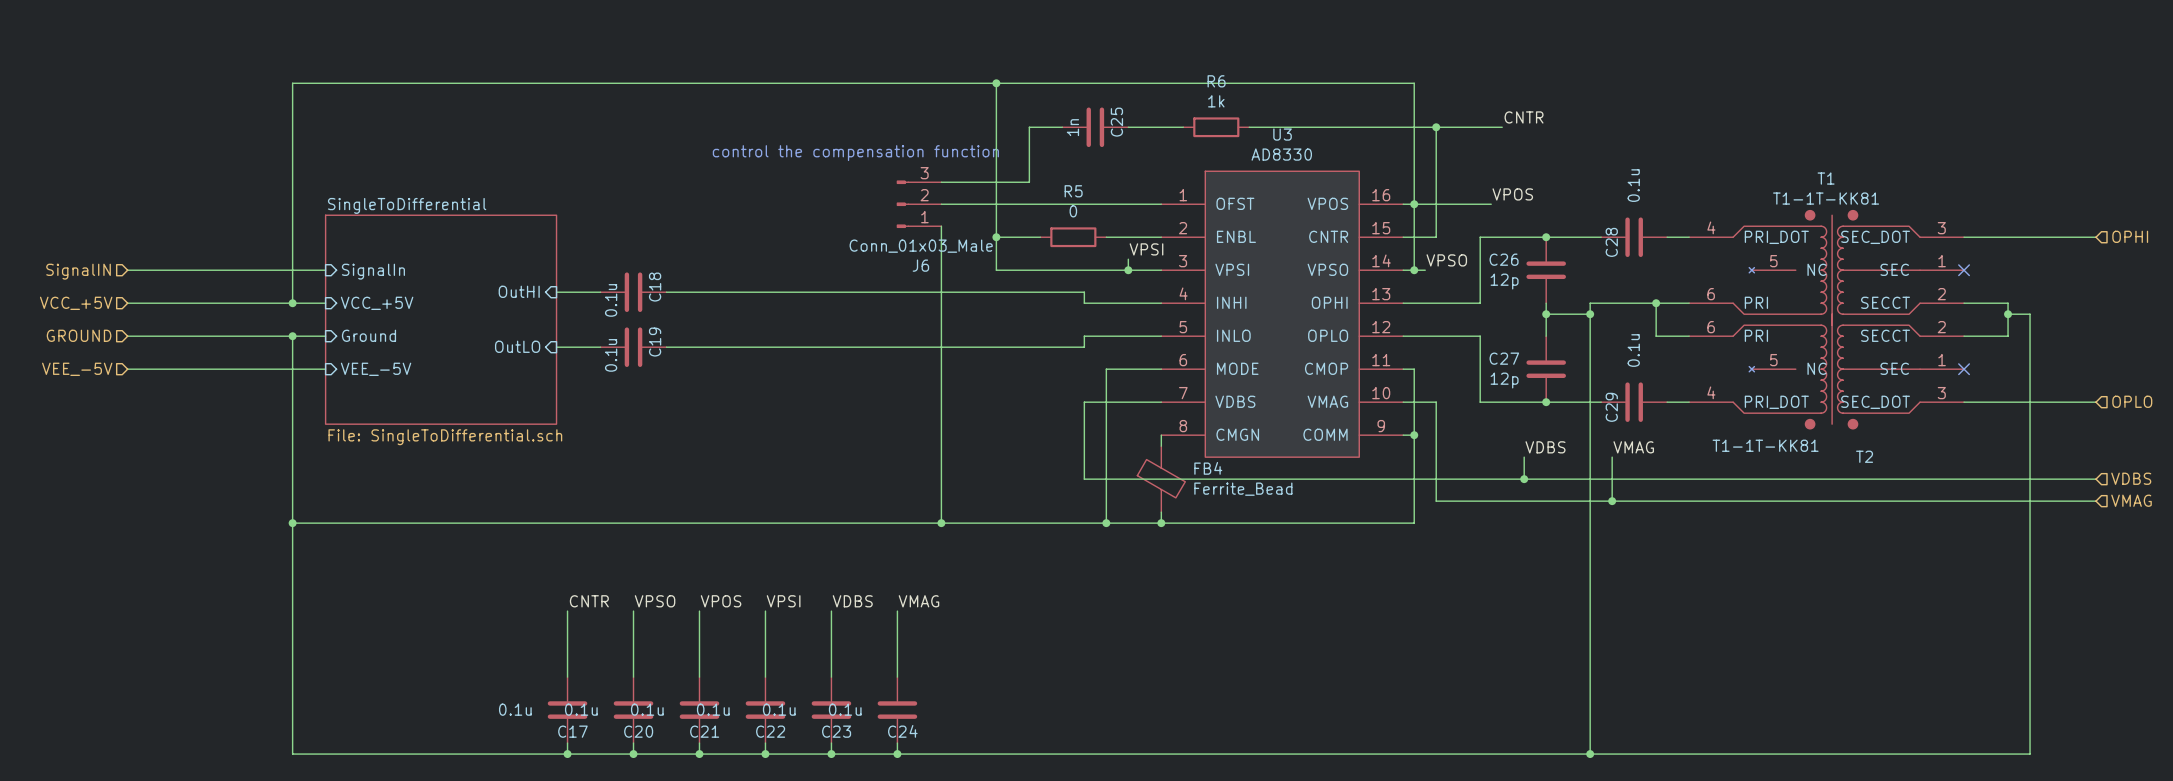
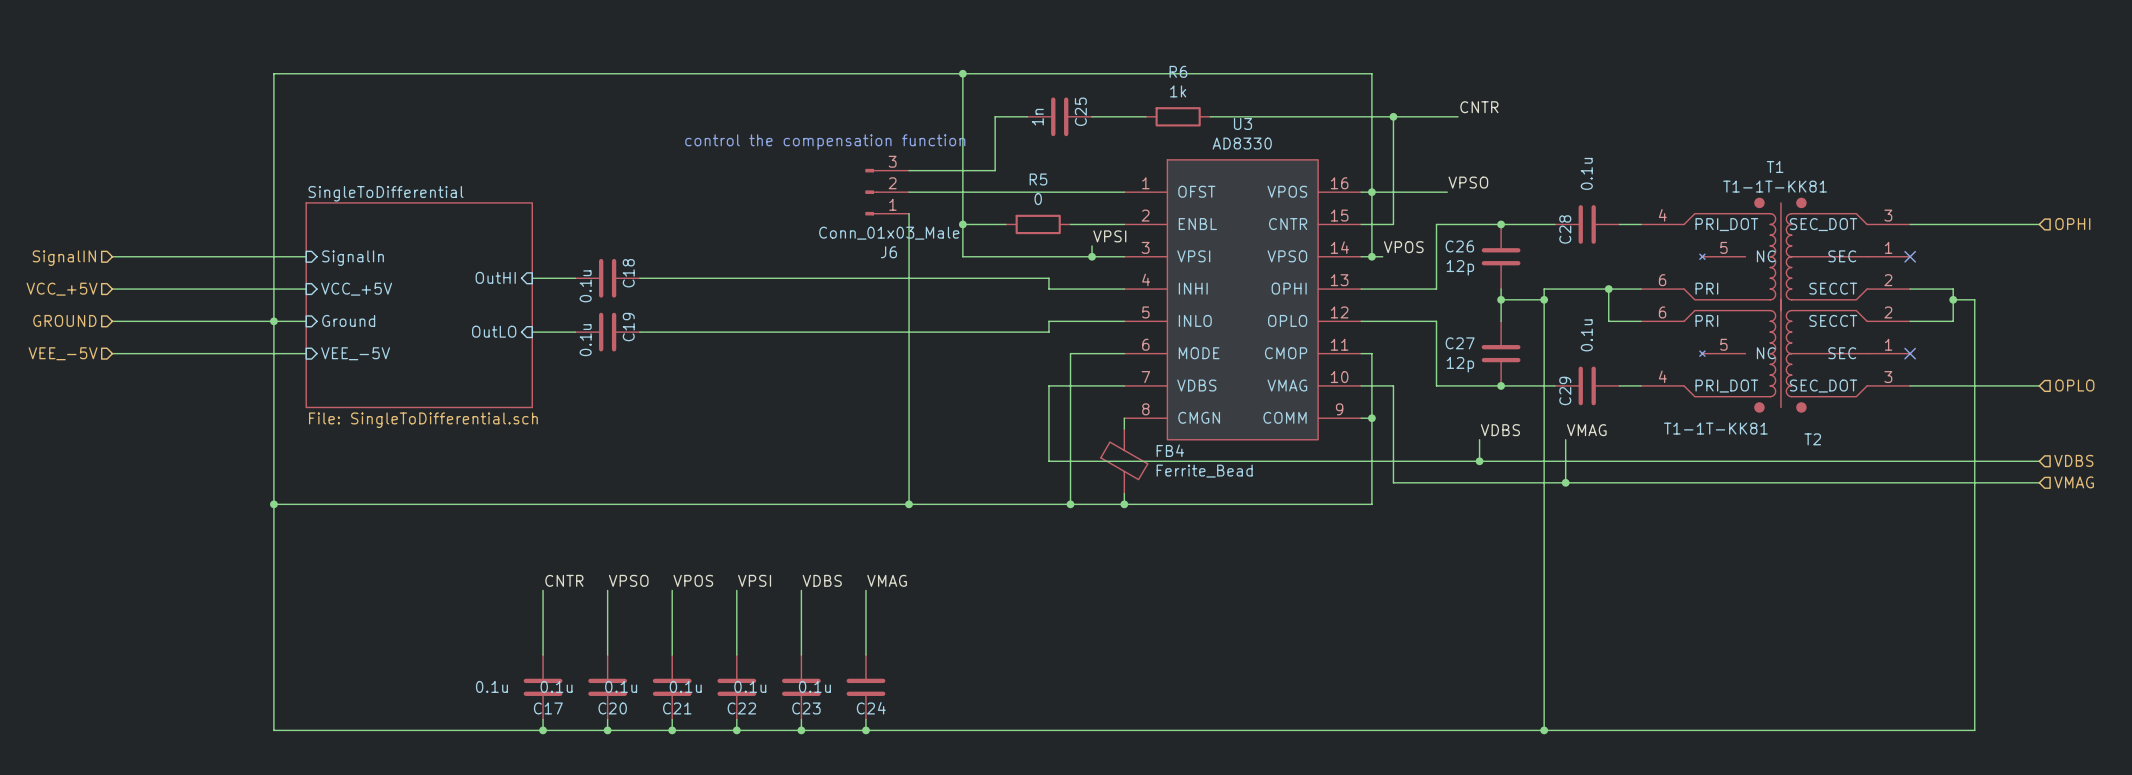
label: VPOS (1512, 194) -> VPSO (1468, 182)
label: VPSO (1446, 260) -> VPOS (1403, 247)
wire: none -> (273, 289) (273, 321)
junction: (292, 303) -> none

